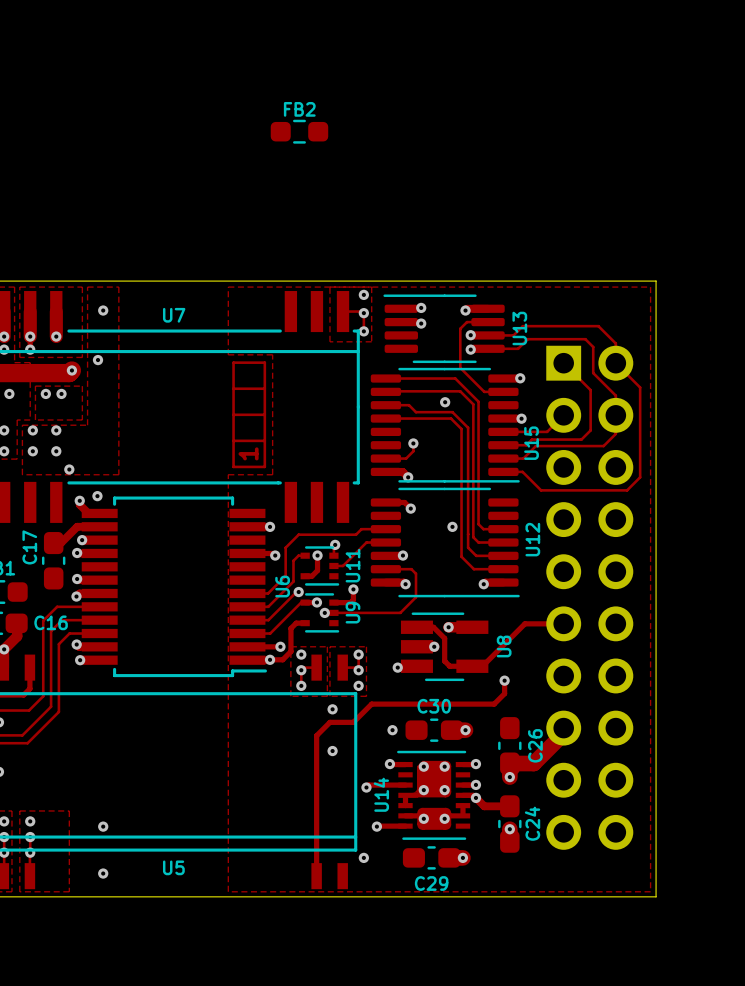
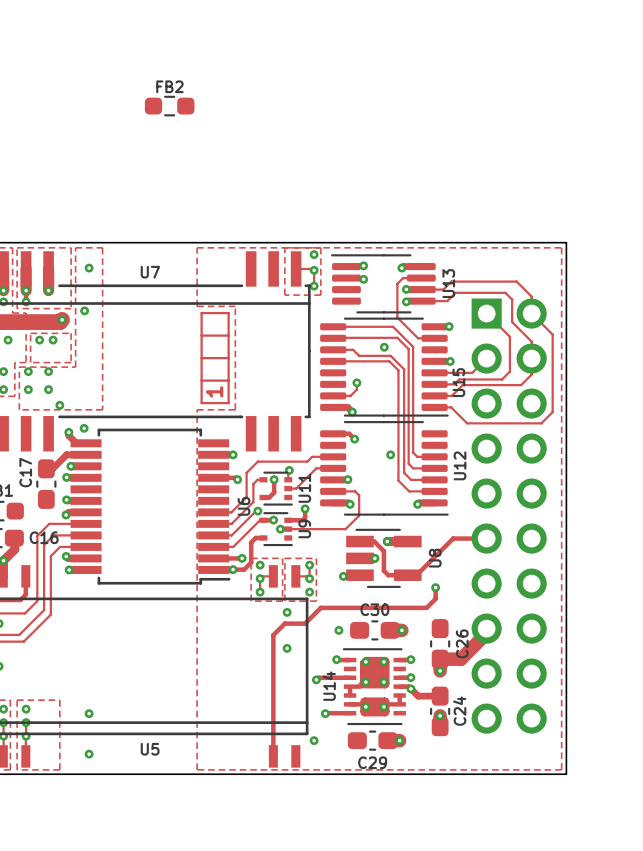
FB2 position: (299, 131) -> (169, 106)

